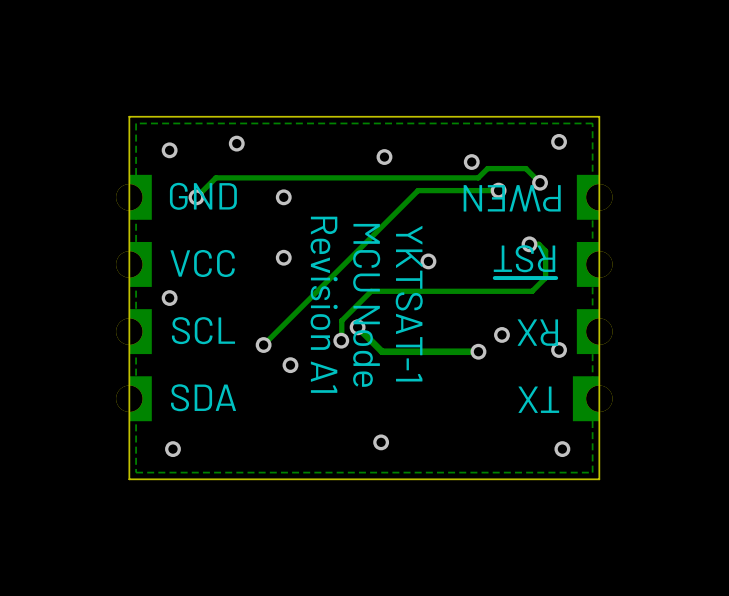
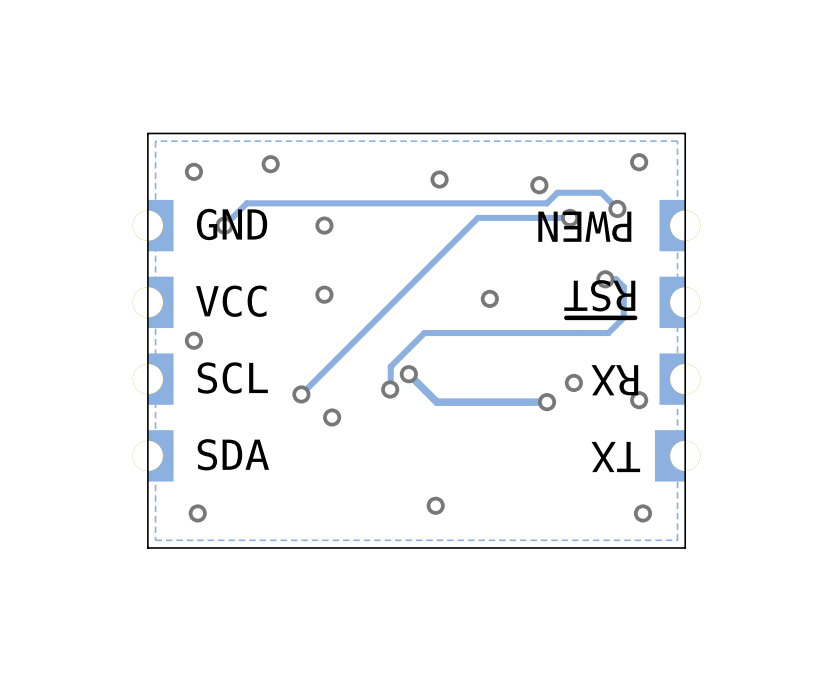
text: YKTSAT-1 (409, 303) -> none
text: Revision A1 (324, 304) -> none
text: MCU Node (366, 305) -> none

